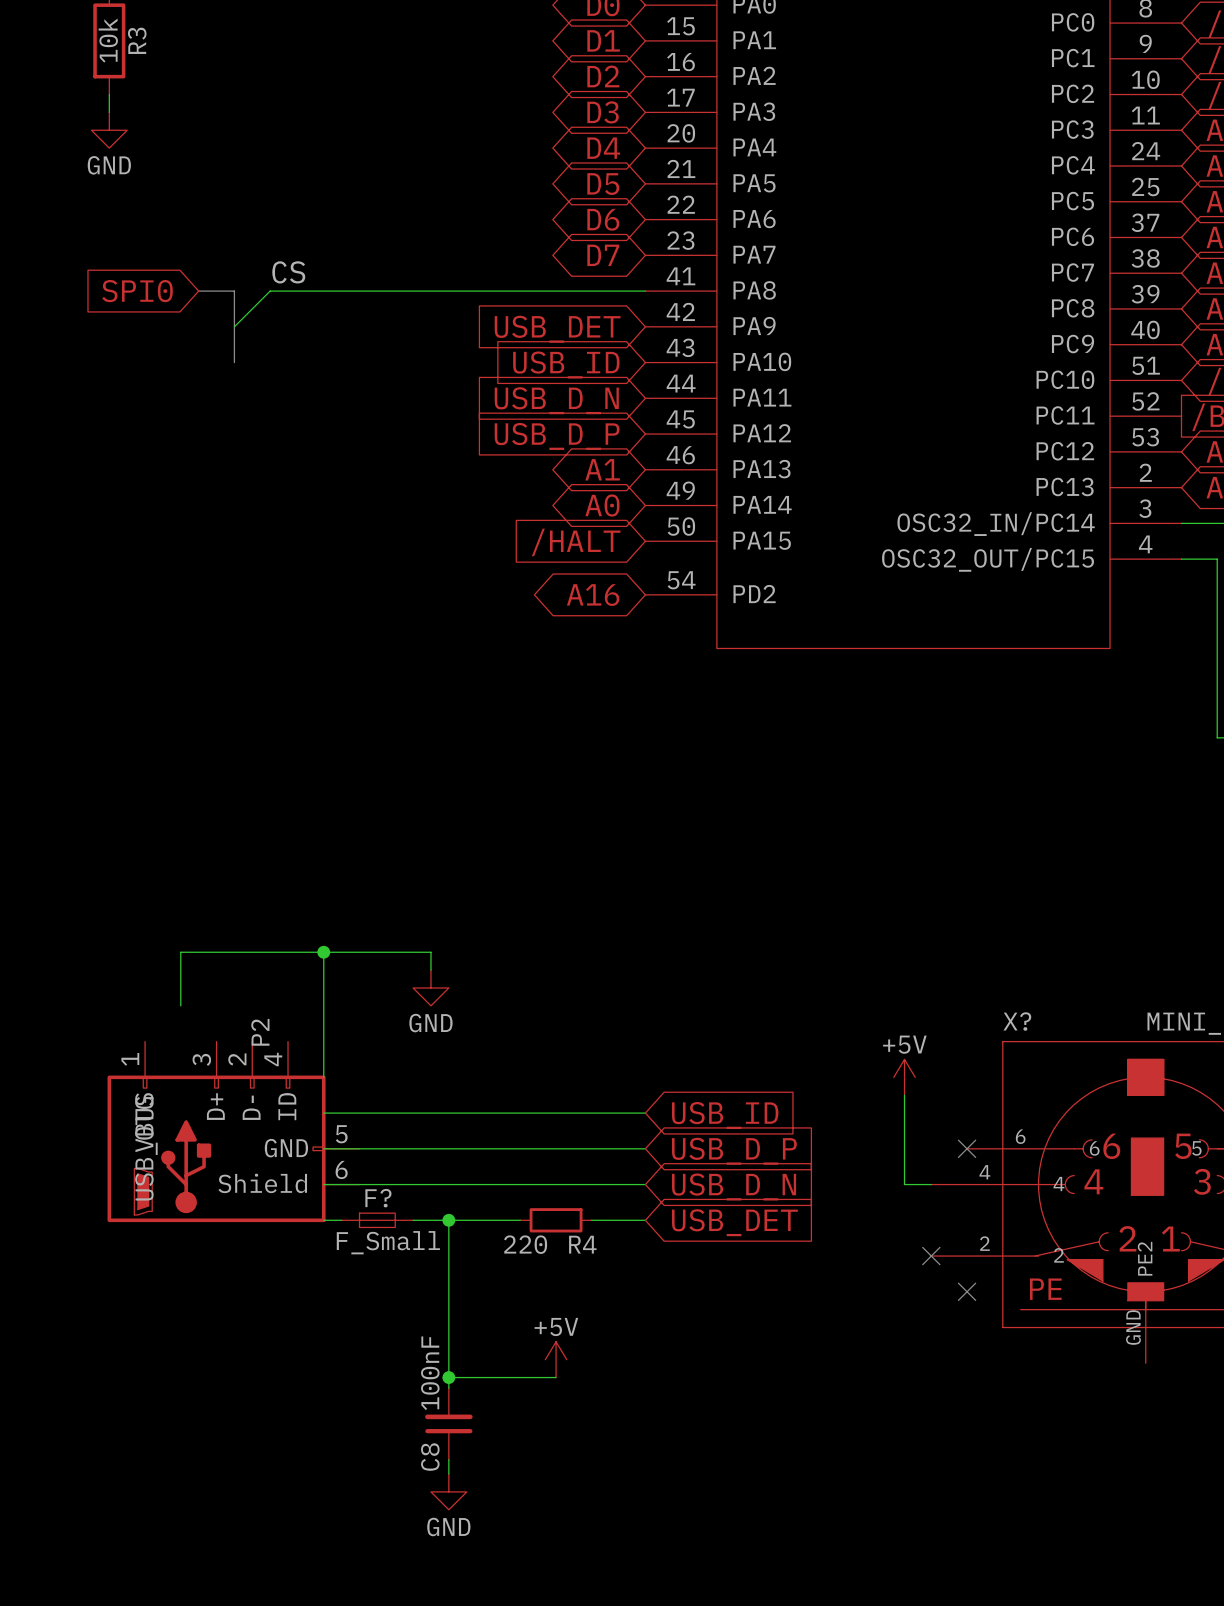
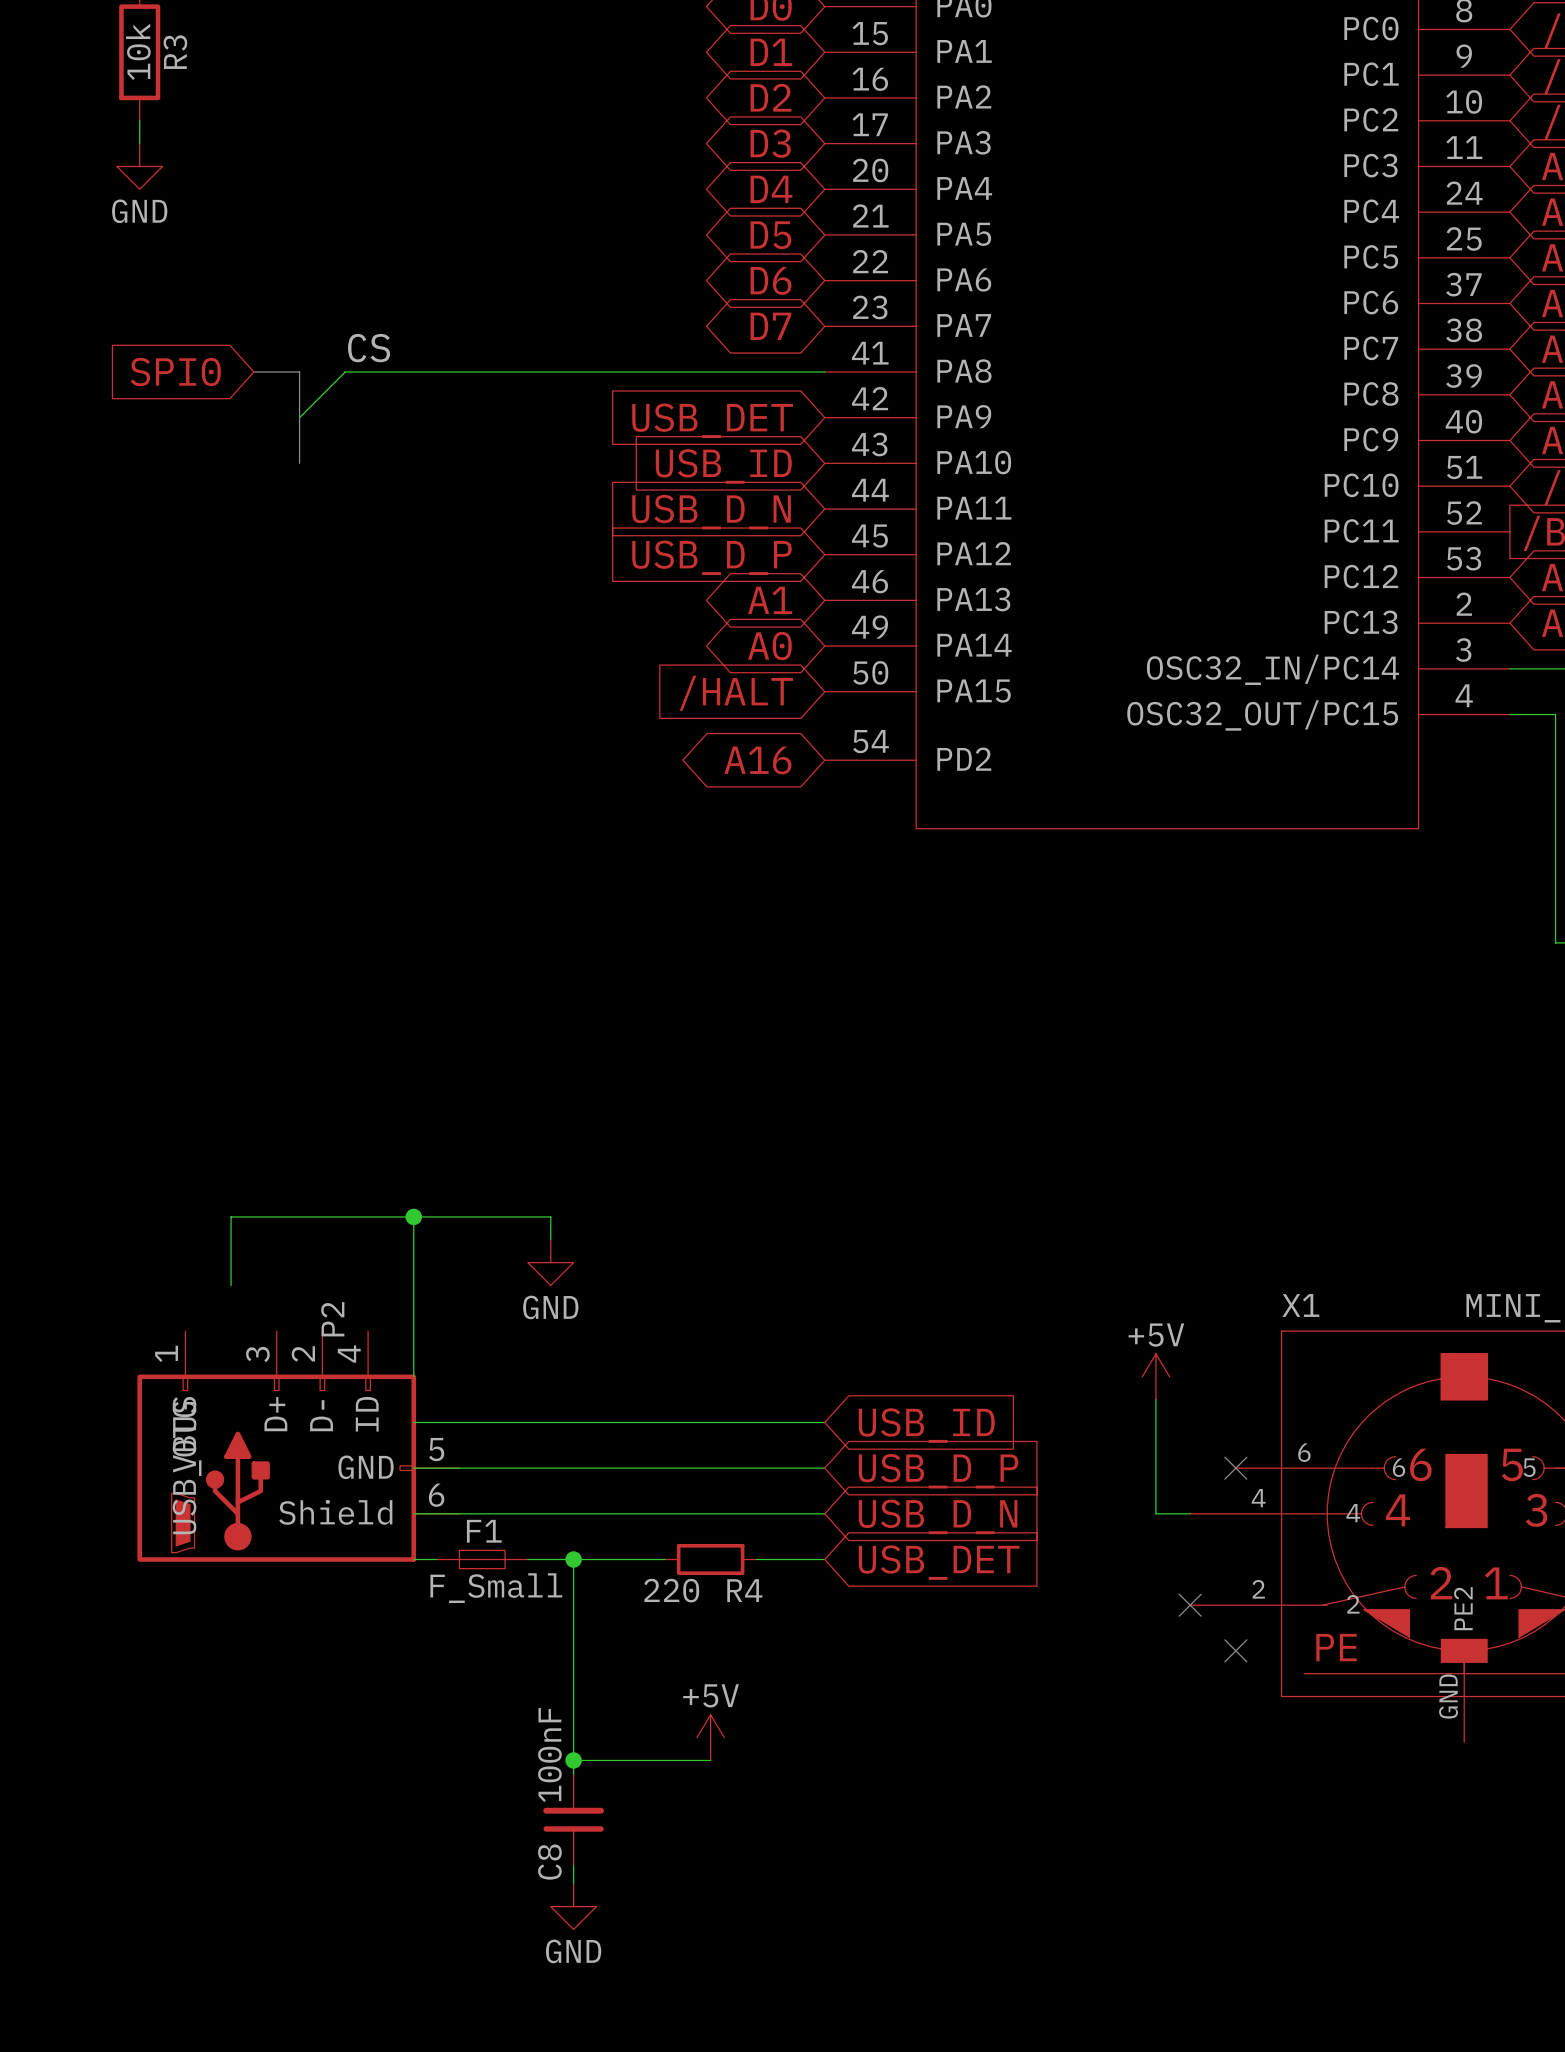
X? name: X? (1017, 1021) -> X1 (1300, 1305)
F? name: F? (378, 1198) -> F1 (484, 1531)

